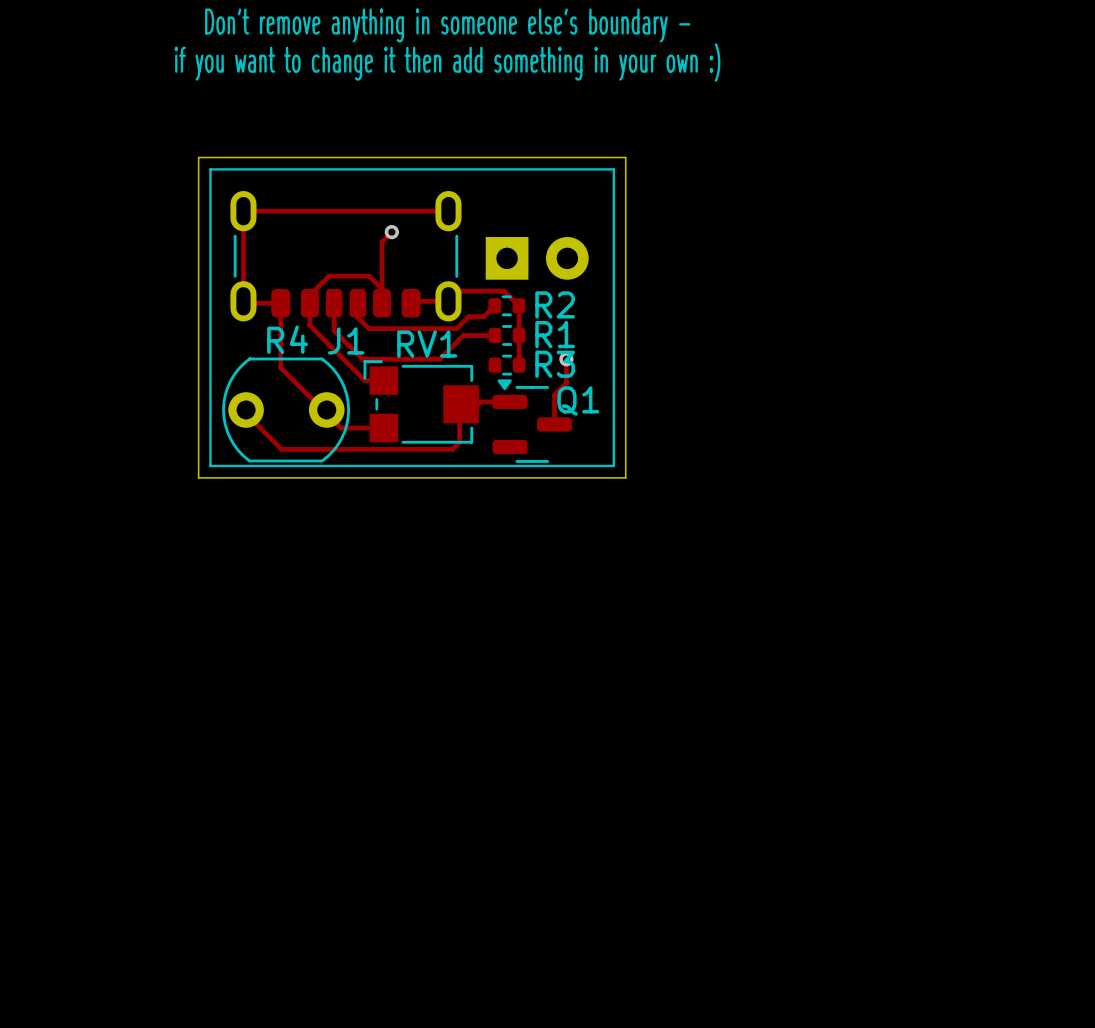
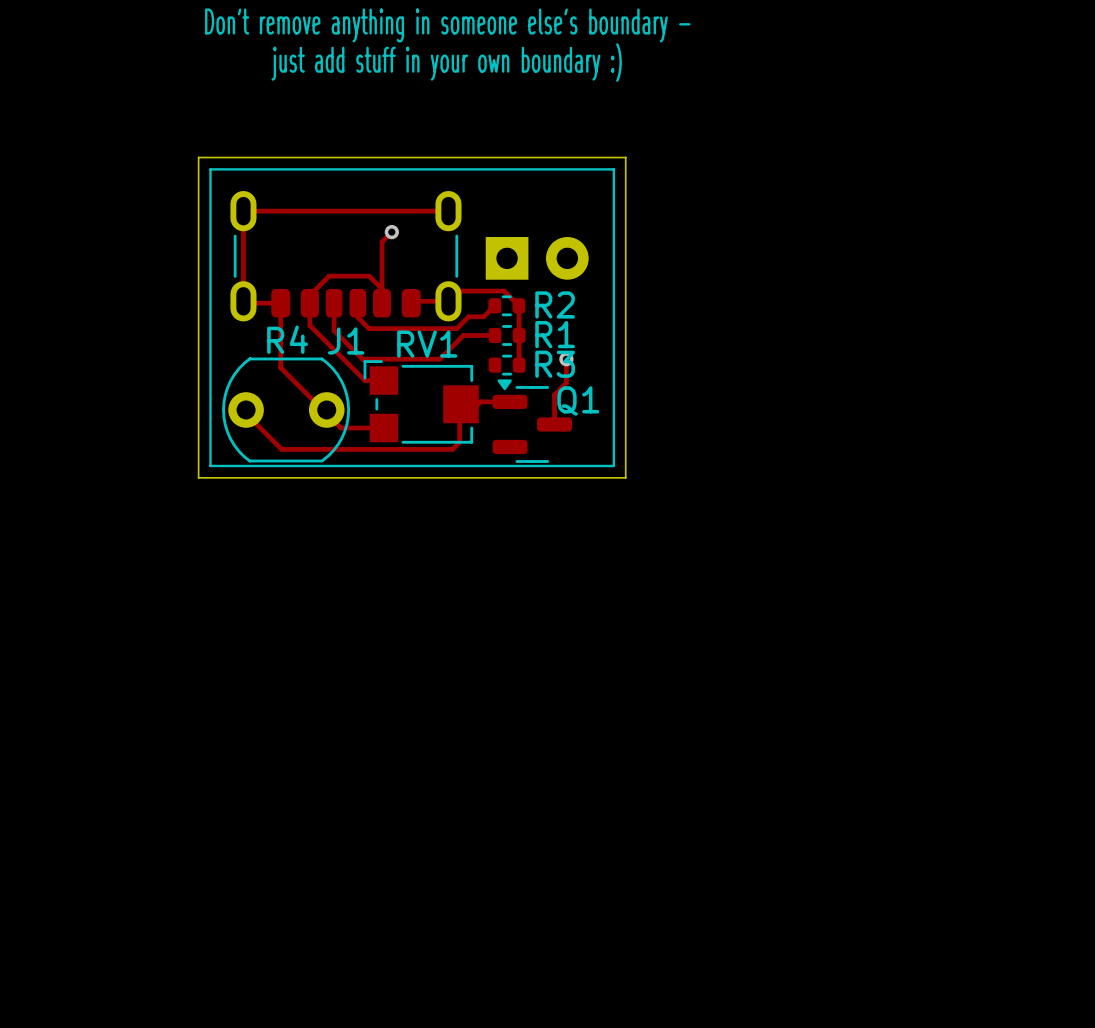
text: if you want to change it then add something in your own :) (447, 62) -> just add stuff in your own boundary :) (446, 62)

